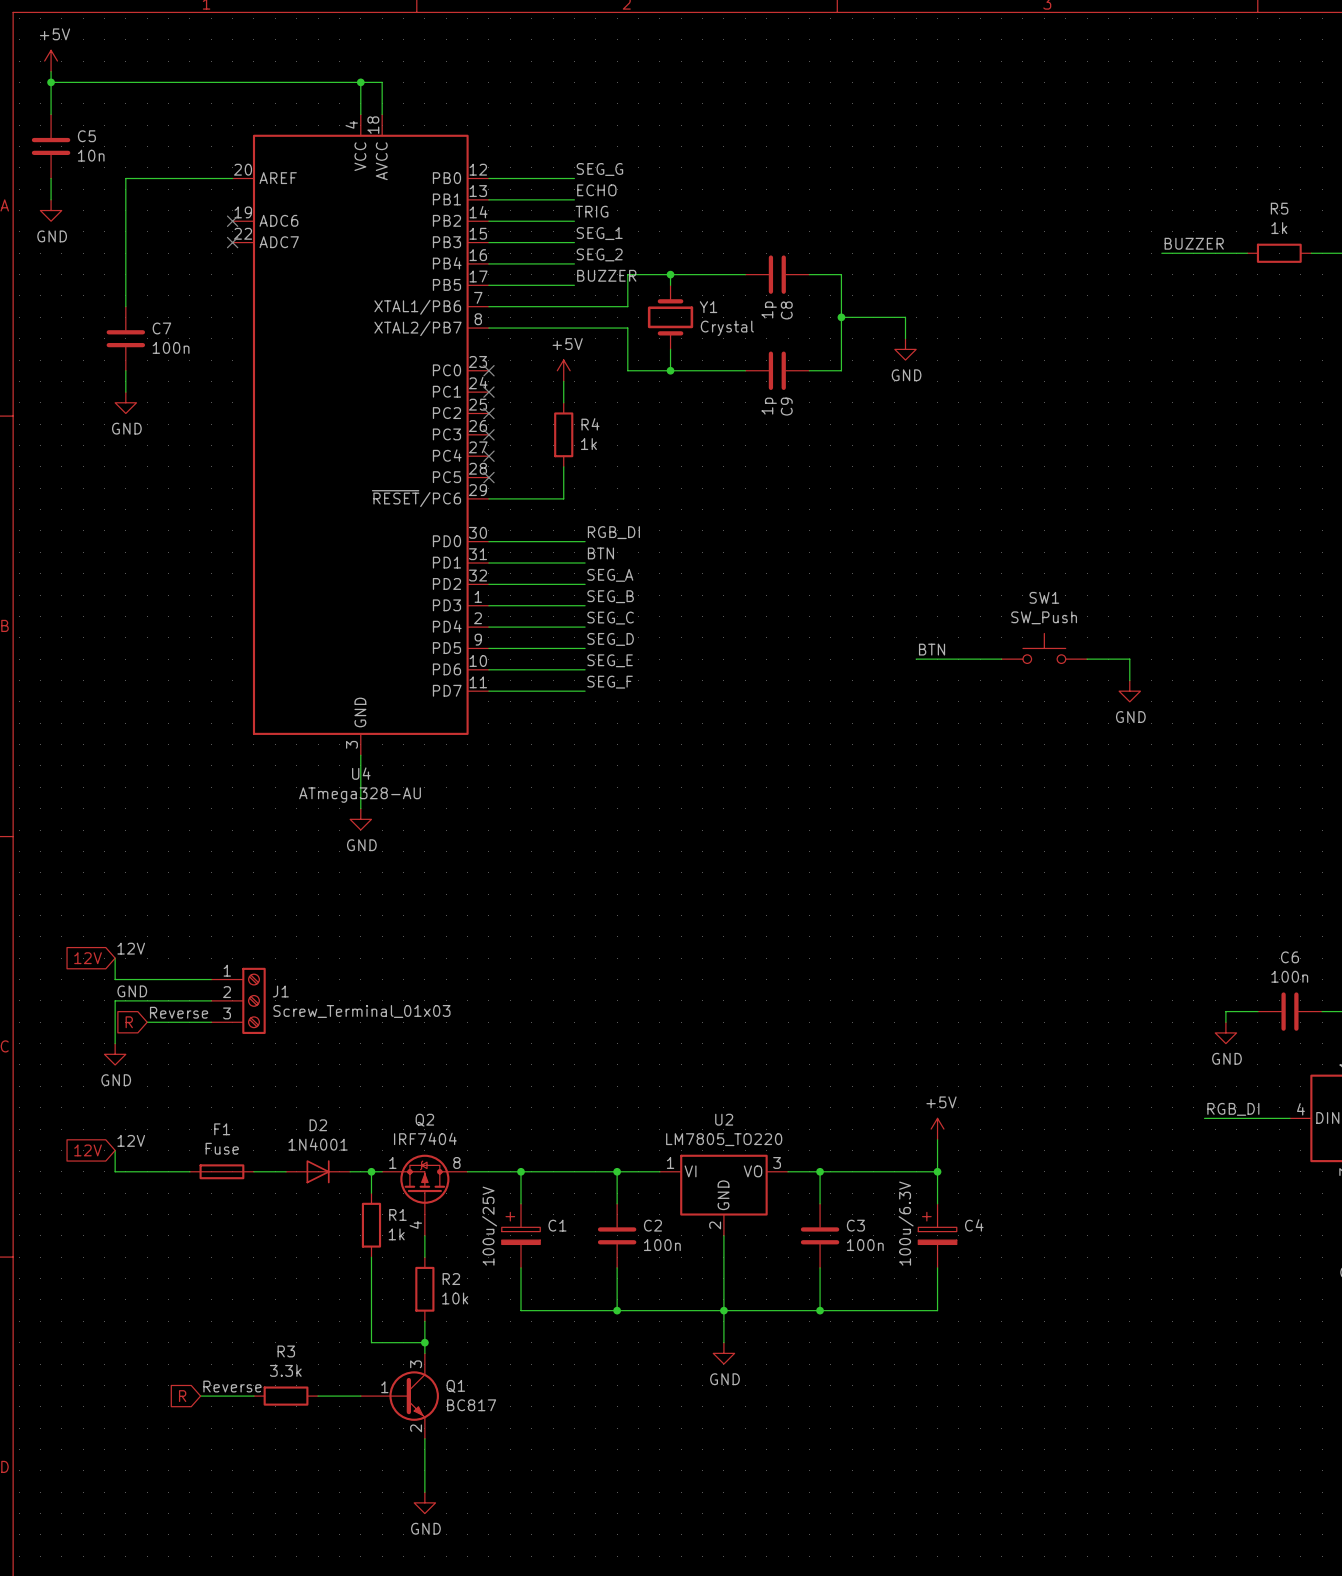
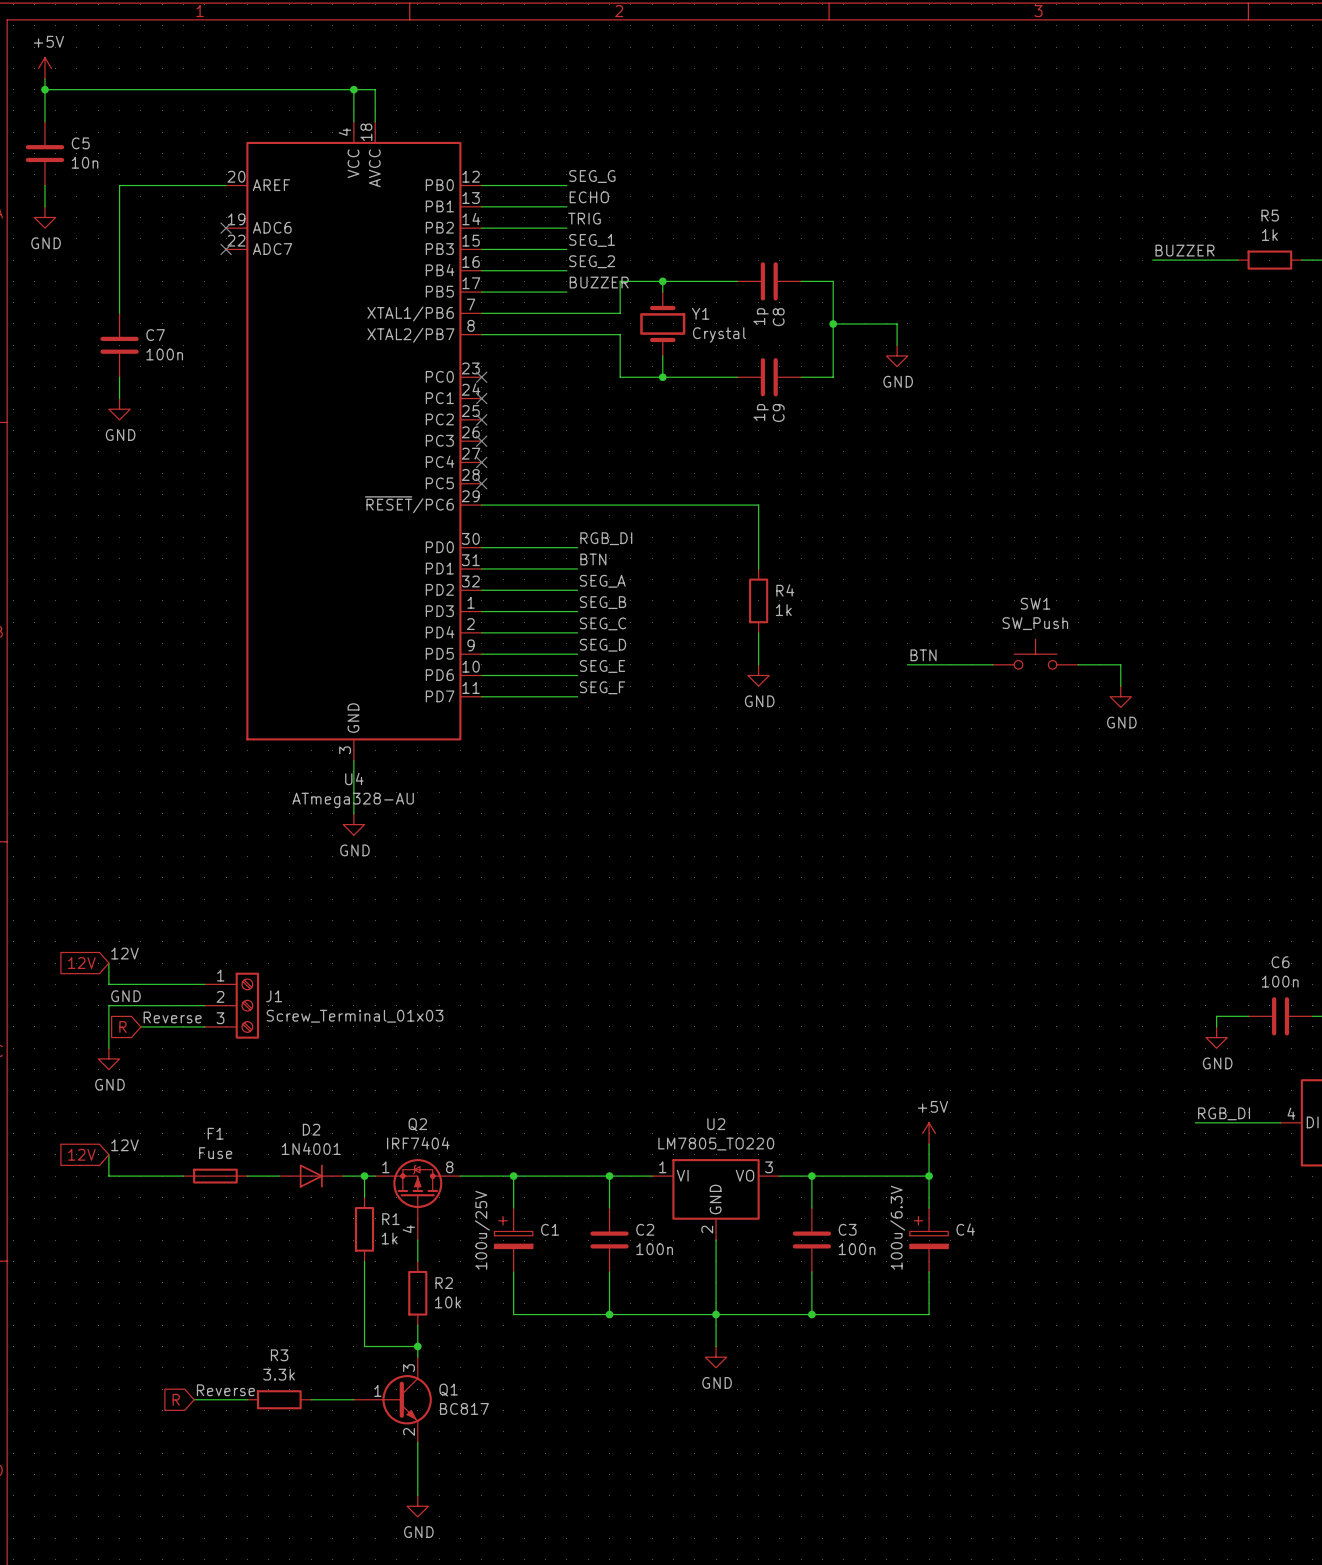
power symbol: +5V (563, 370) -> none
wire: (563, 381) (563, 402) -> none
R4 position: (563, 434) -> (758, 600)
wire: (563, 466) (563, 498) -> (758, 568) (758, 505) (556, 505)
wire: none -> (758, 632) (758, 664)
power symbol: none -> GND (758, 675)

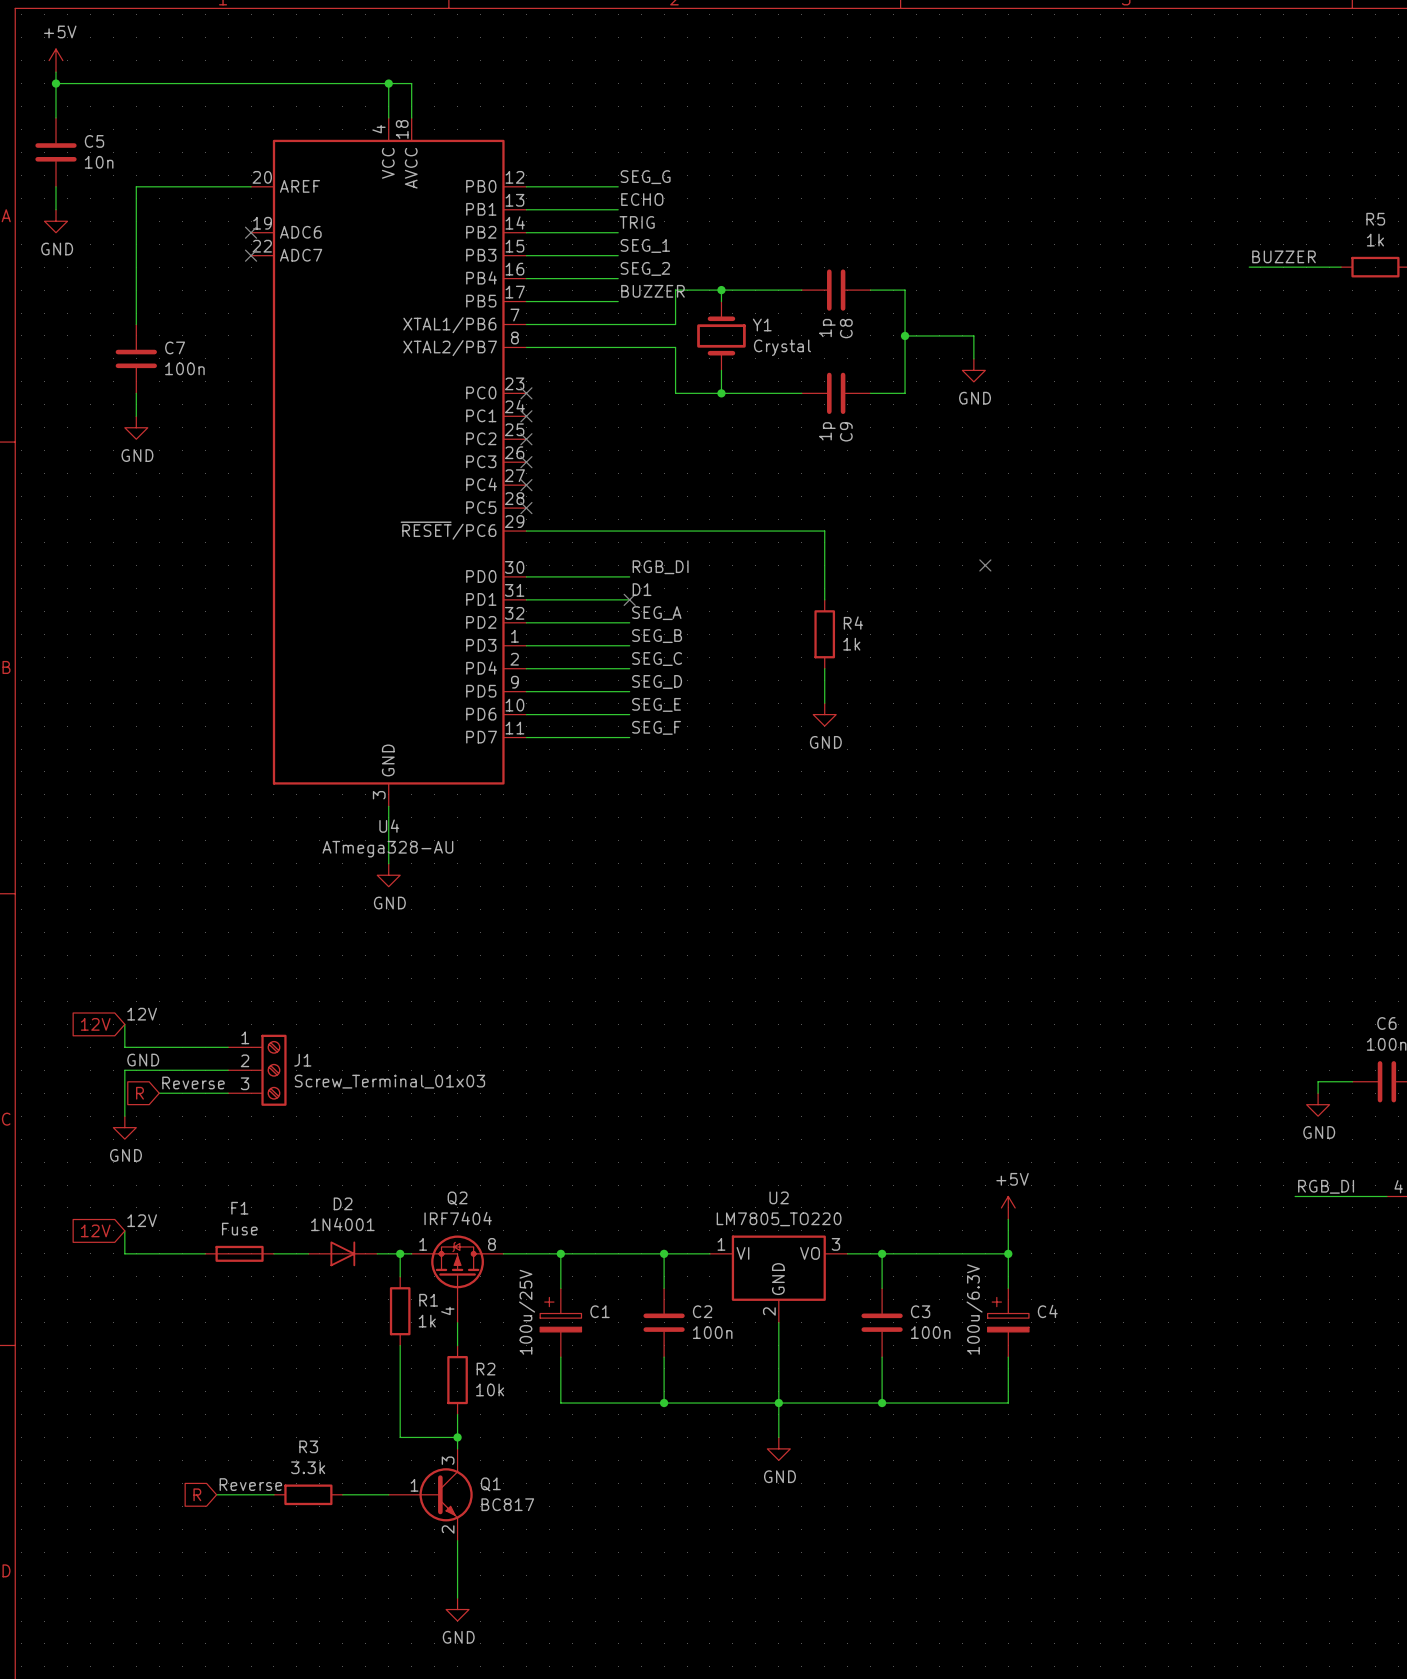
no-connect mark: none -> (985, 565)
label: BTN (593, 559) -> D1 (642, 589)
no-connect mark: none -> (629, 599)
SW1: SW_Push (1035, 654) -> none
label: BTN (923, 655) -> none
wire: (907, 664) (992, 664) -> none
wire: (1078, 664) (1120, 664) (1120, 686) -> none
power symbol: GND (1120, 696) -> none

